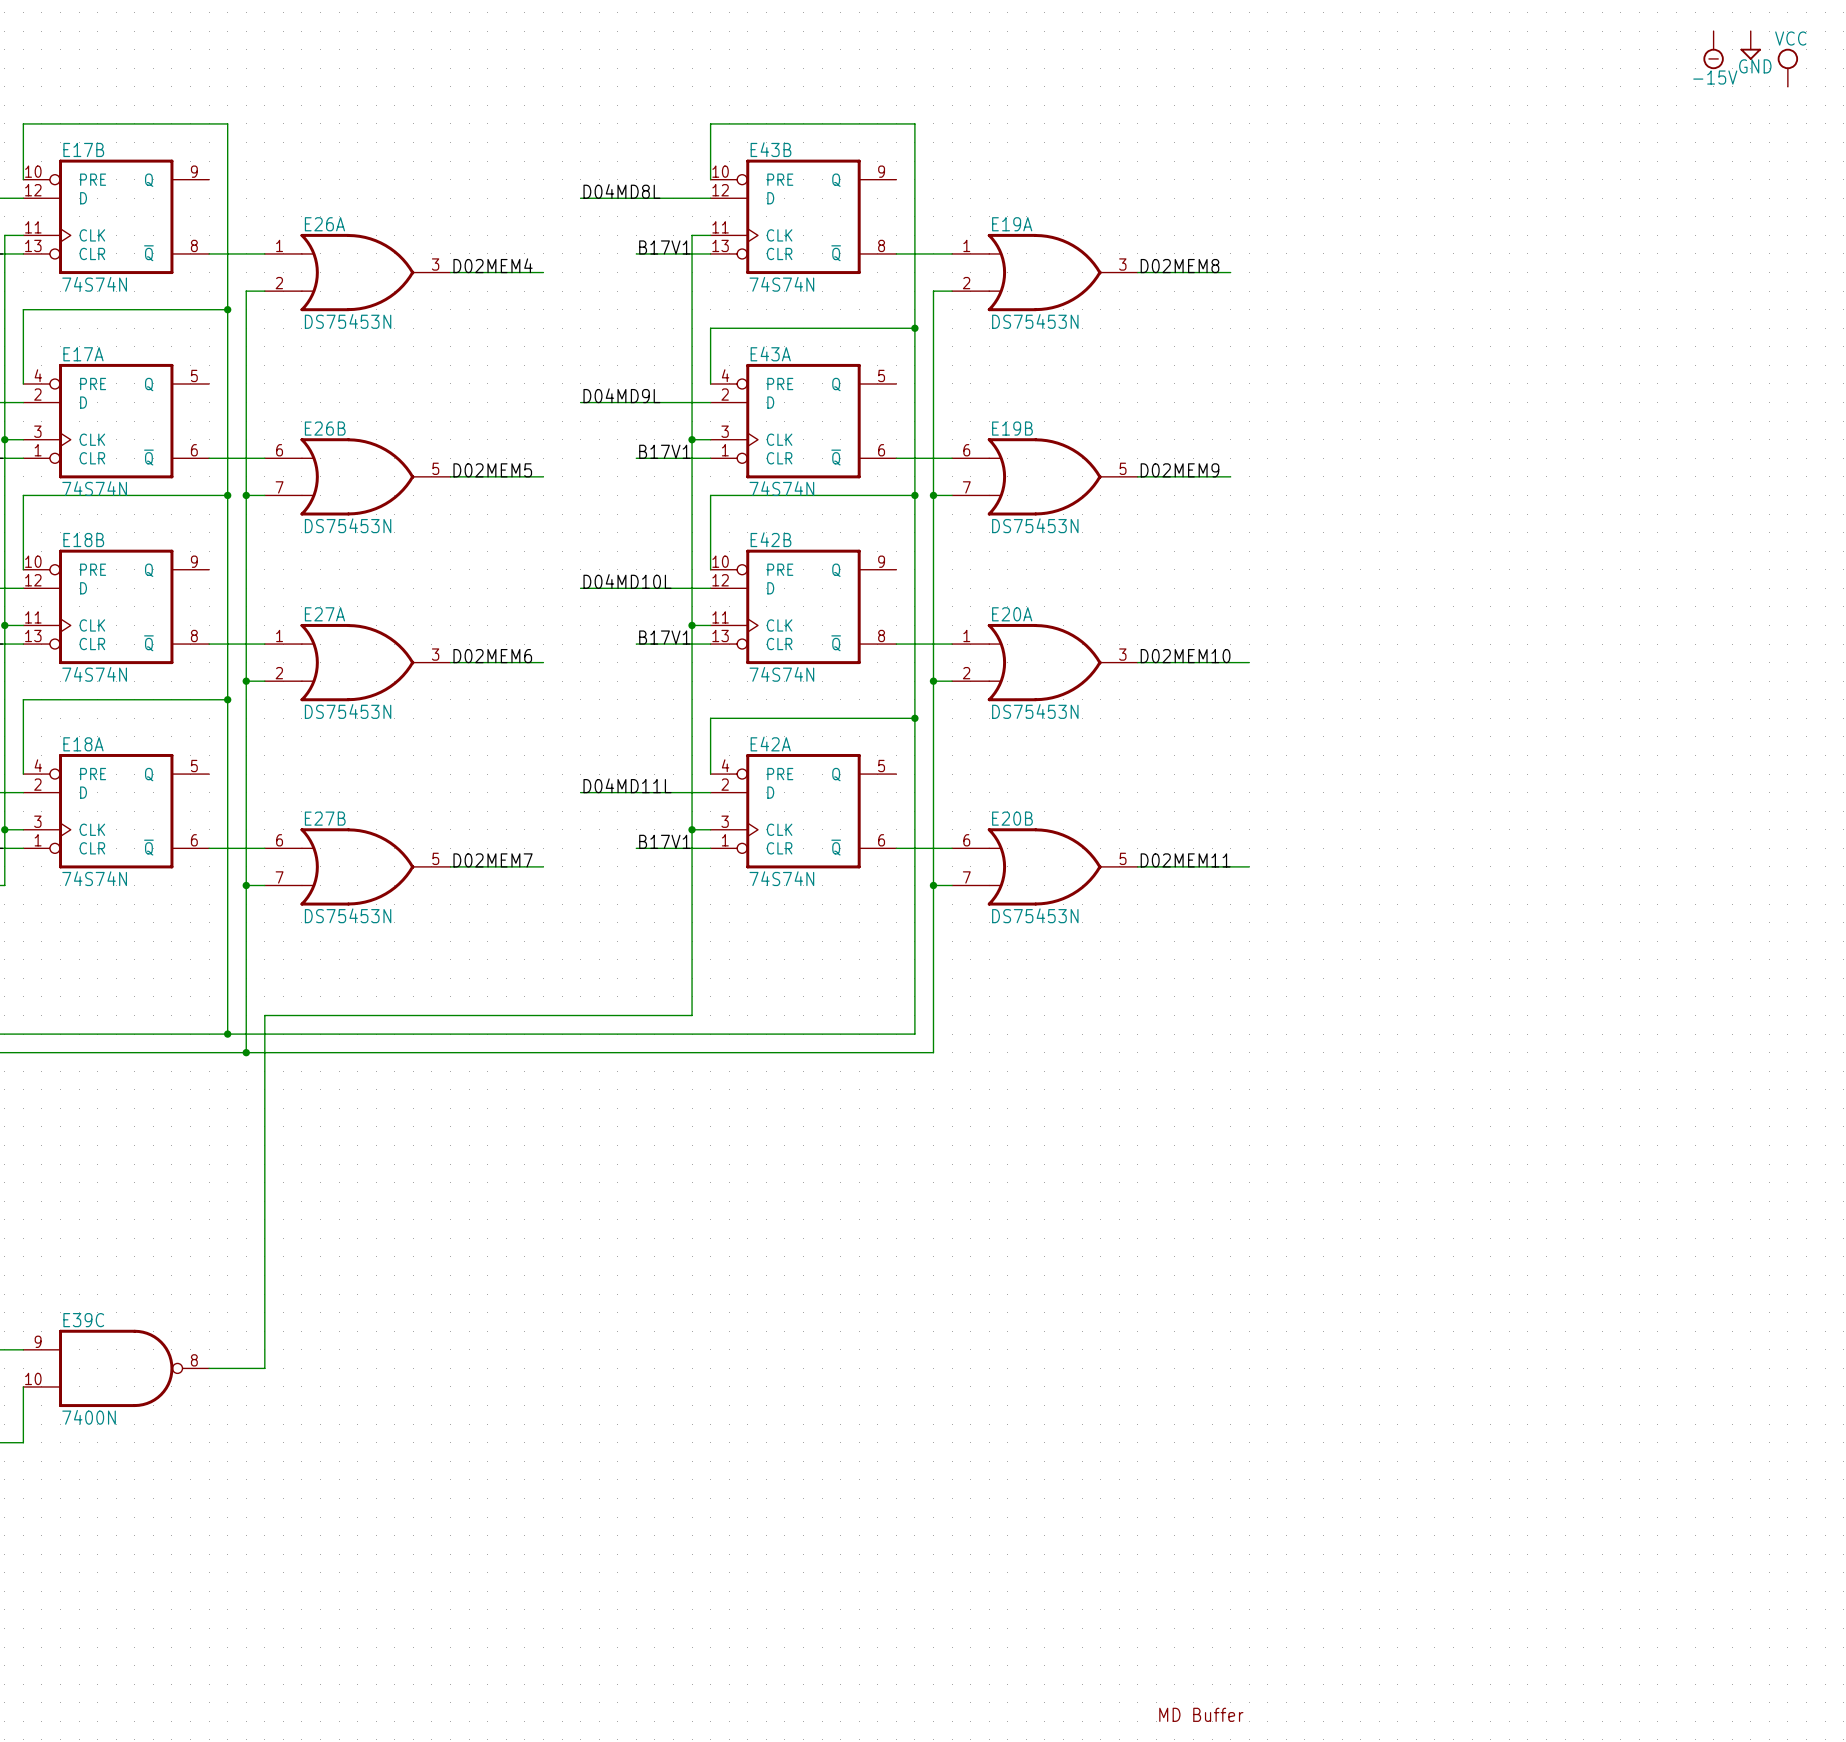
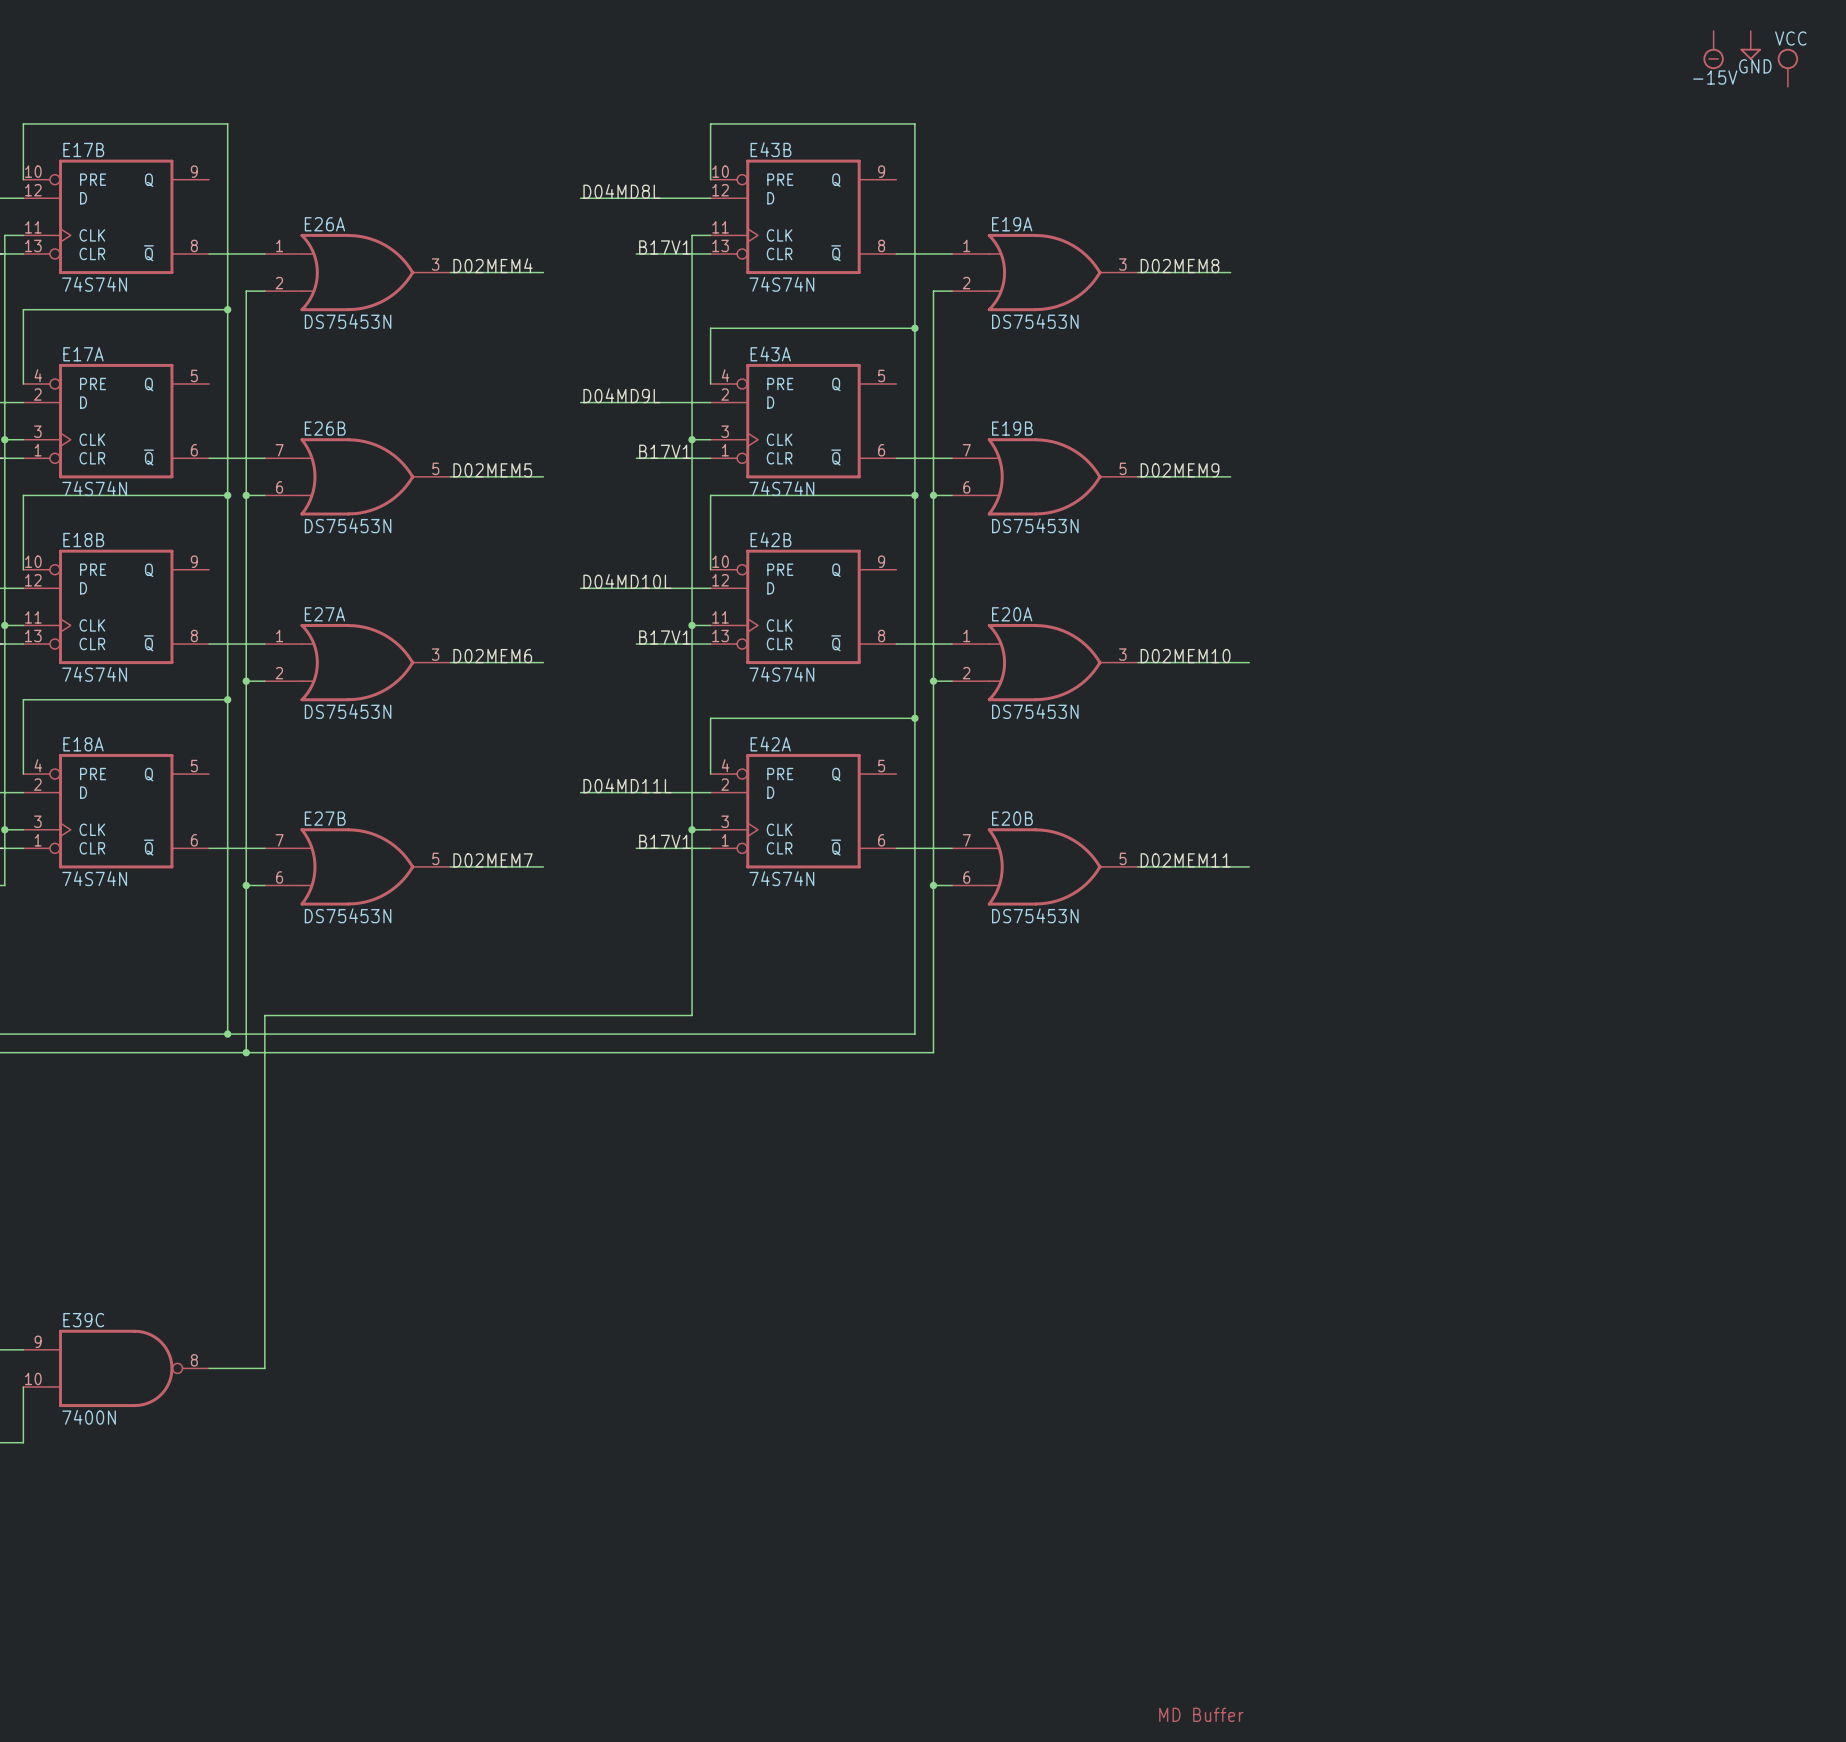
E26B symbol: [264, 438, 451, 516] -> [264, 438, 451, 516]
E19B symbol: [952, 438, 1138, 516] -> [952, 438, 1138, 516]
E27B symbol: [264, 828, 451, 906] -> [264, 828, 451, 906]
E20B symbol: [952, 828, 1138, 906] -> [952, 828, 1138, 906]

